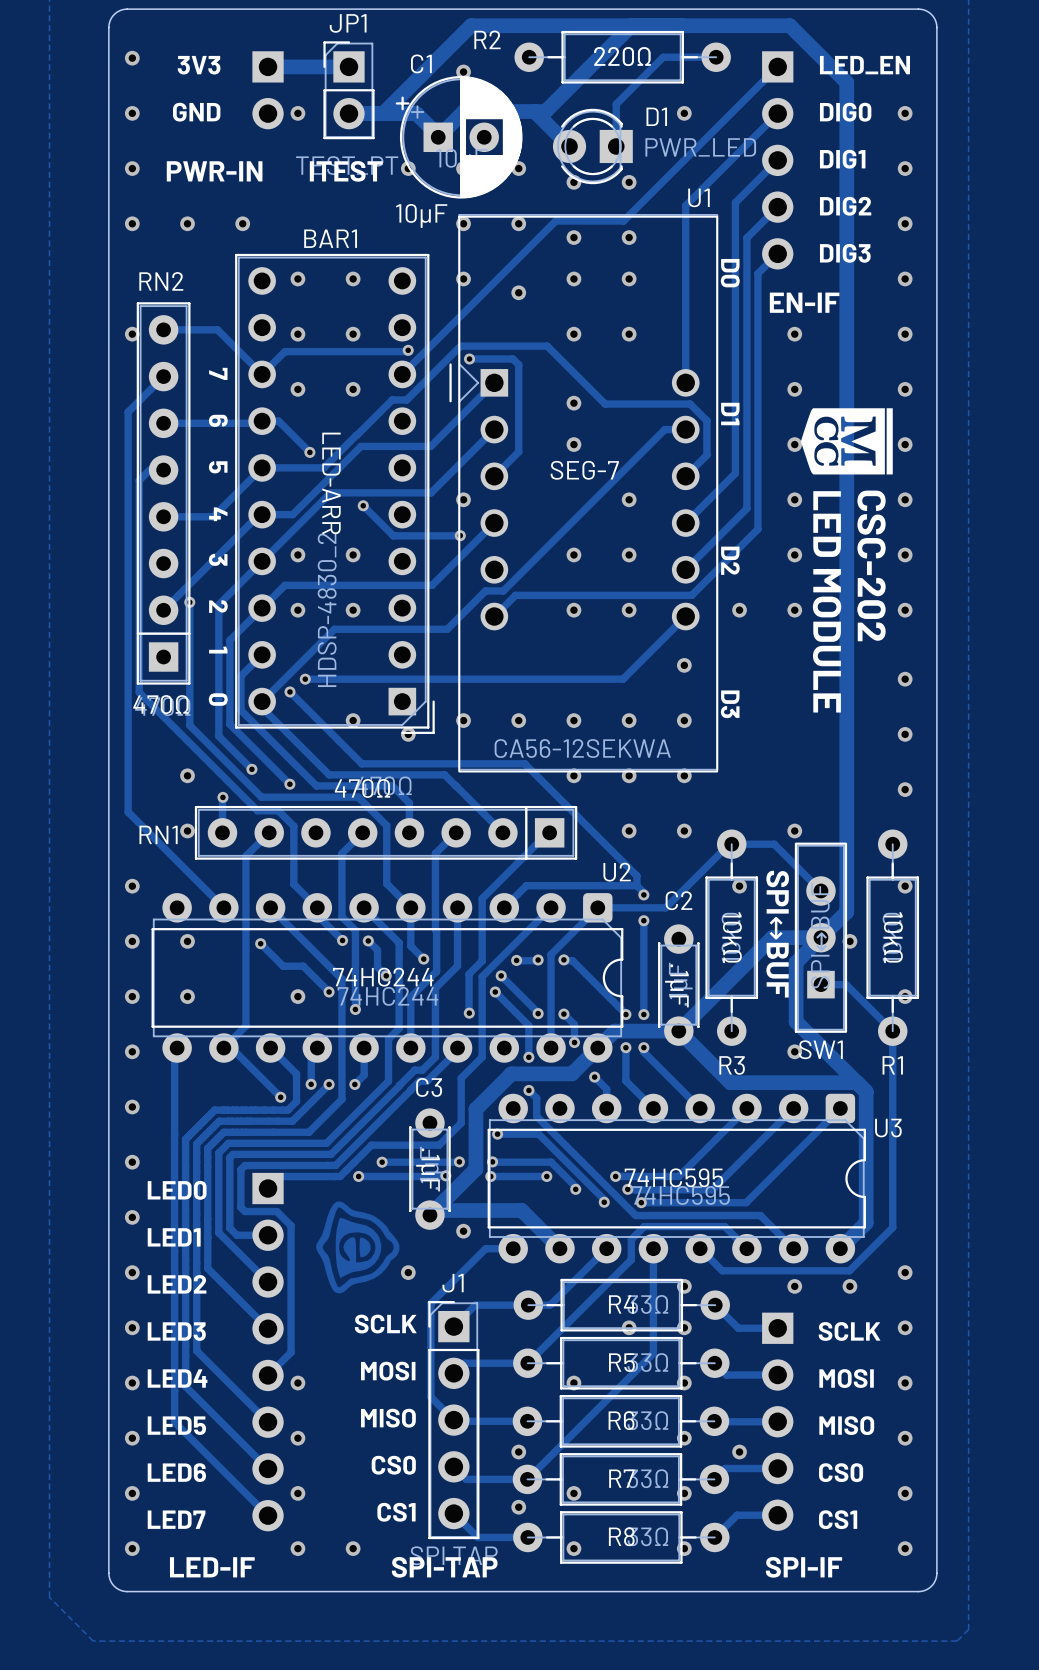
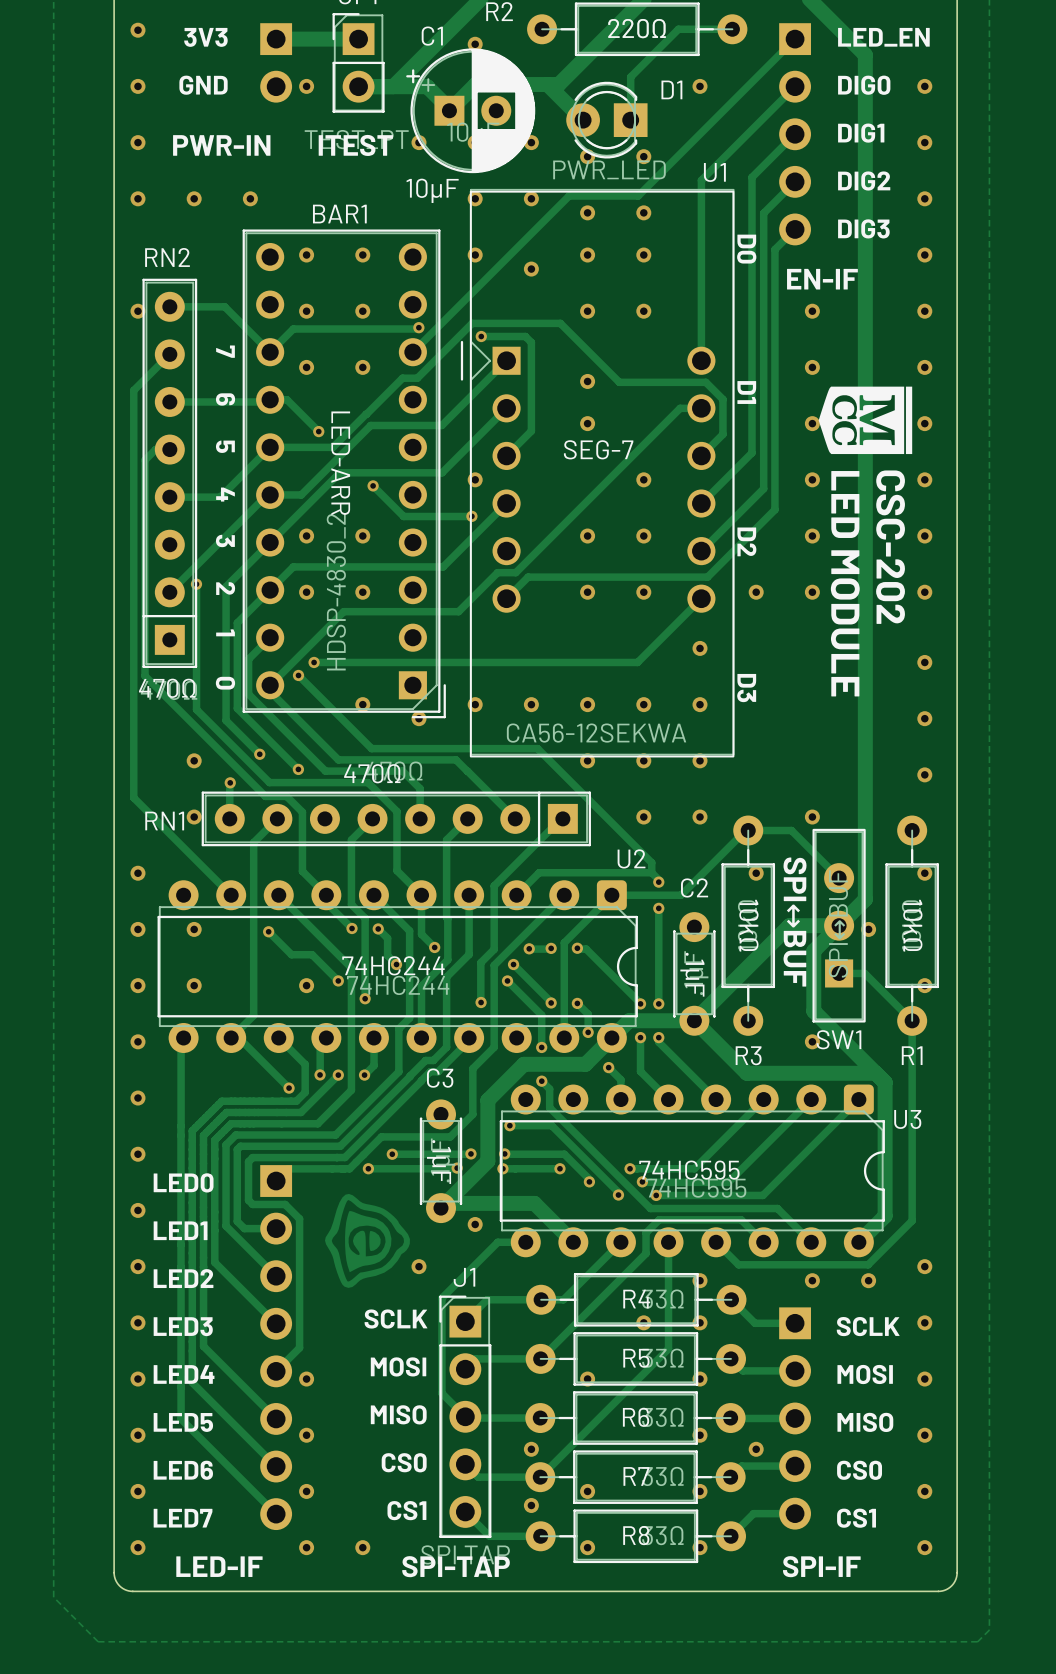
D1 value position: PWR_LED (700, 147) -> PWR_LED (609, 169)

